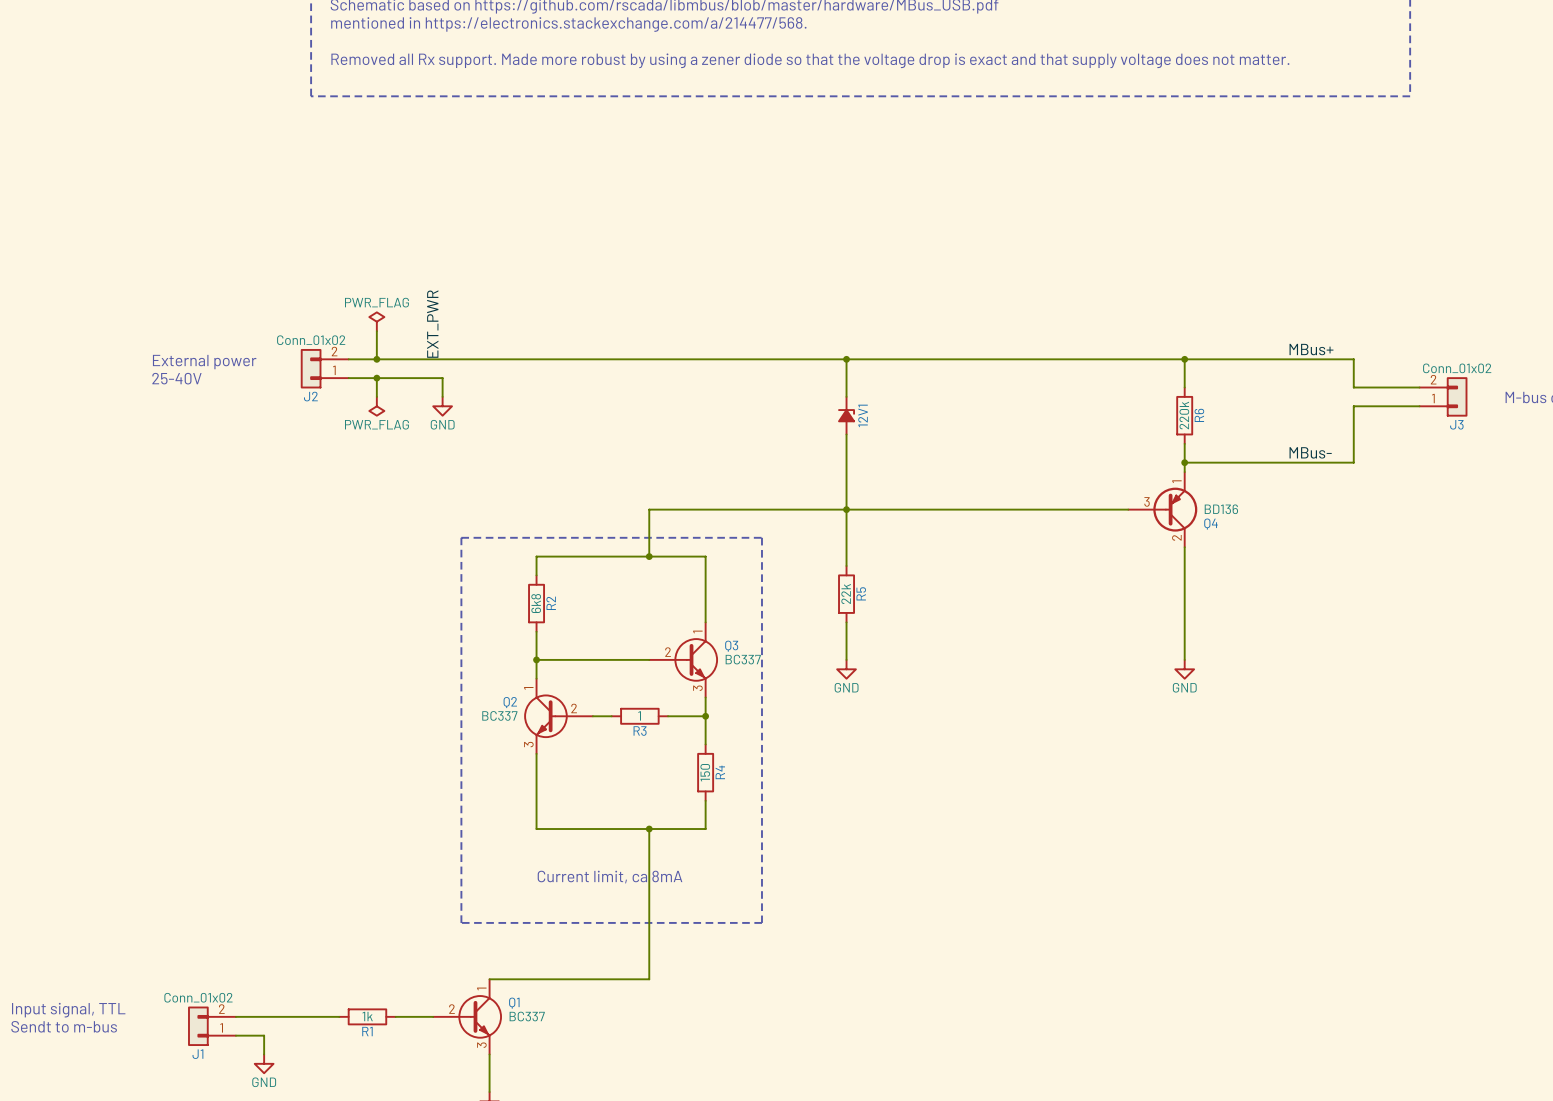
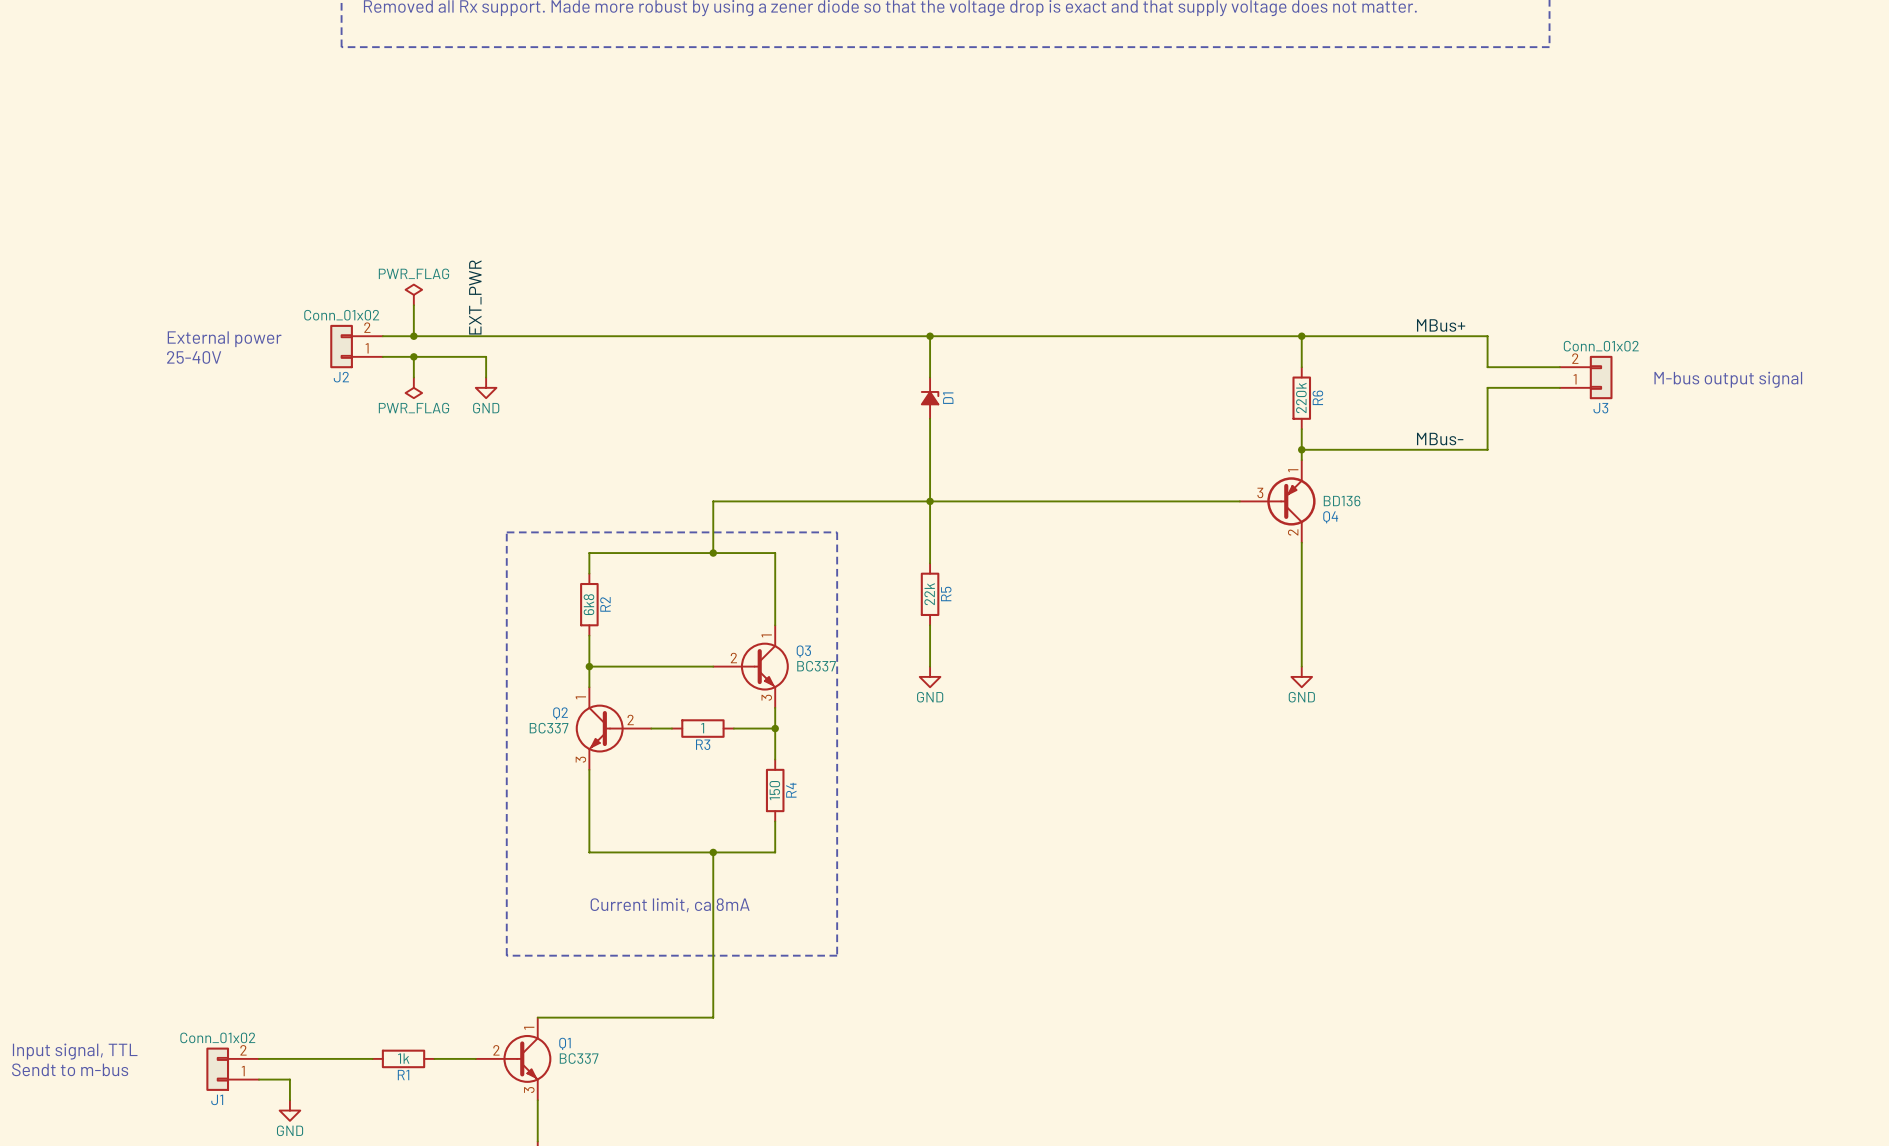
12V1 name: 12V1 (863, 415) -> D1 (948, 398)

